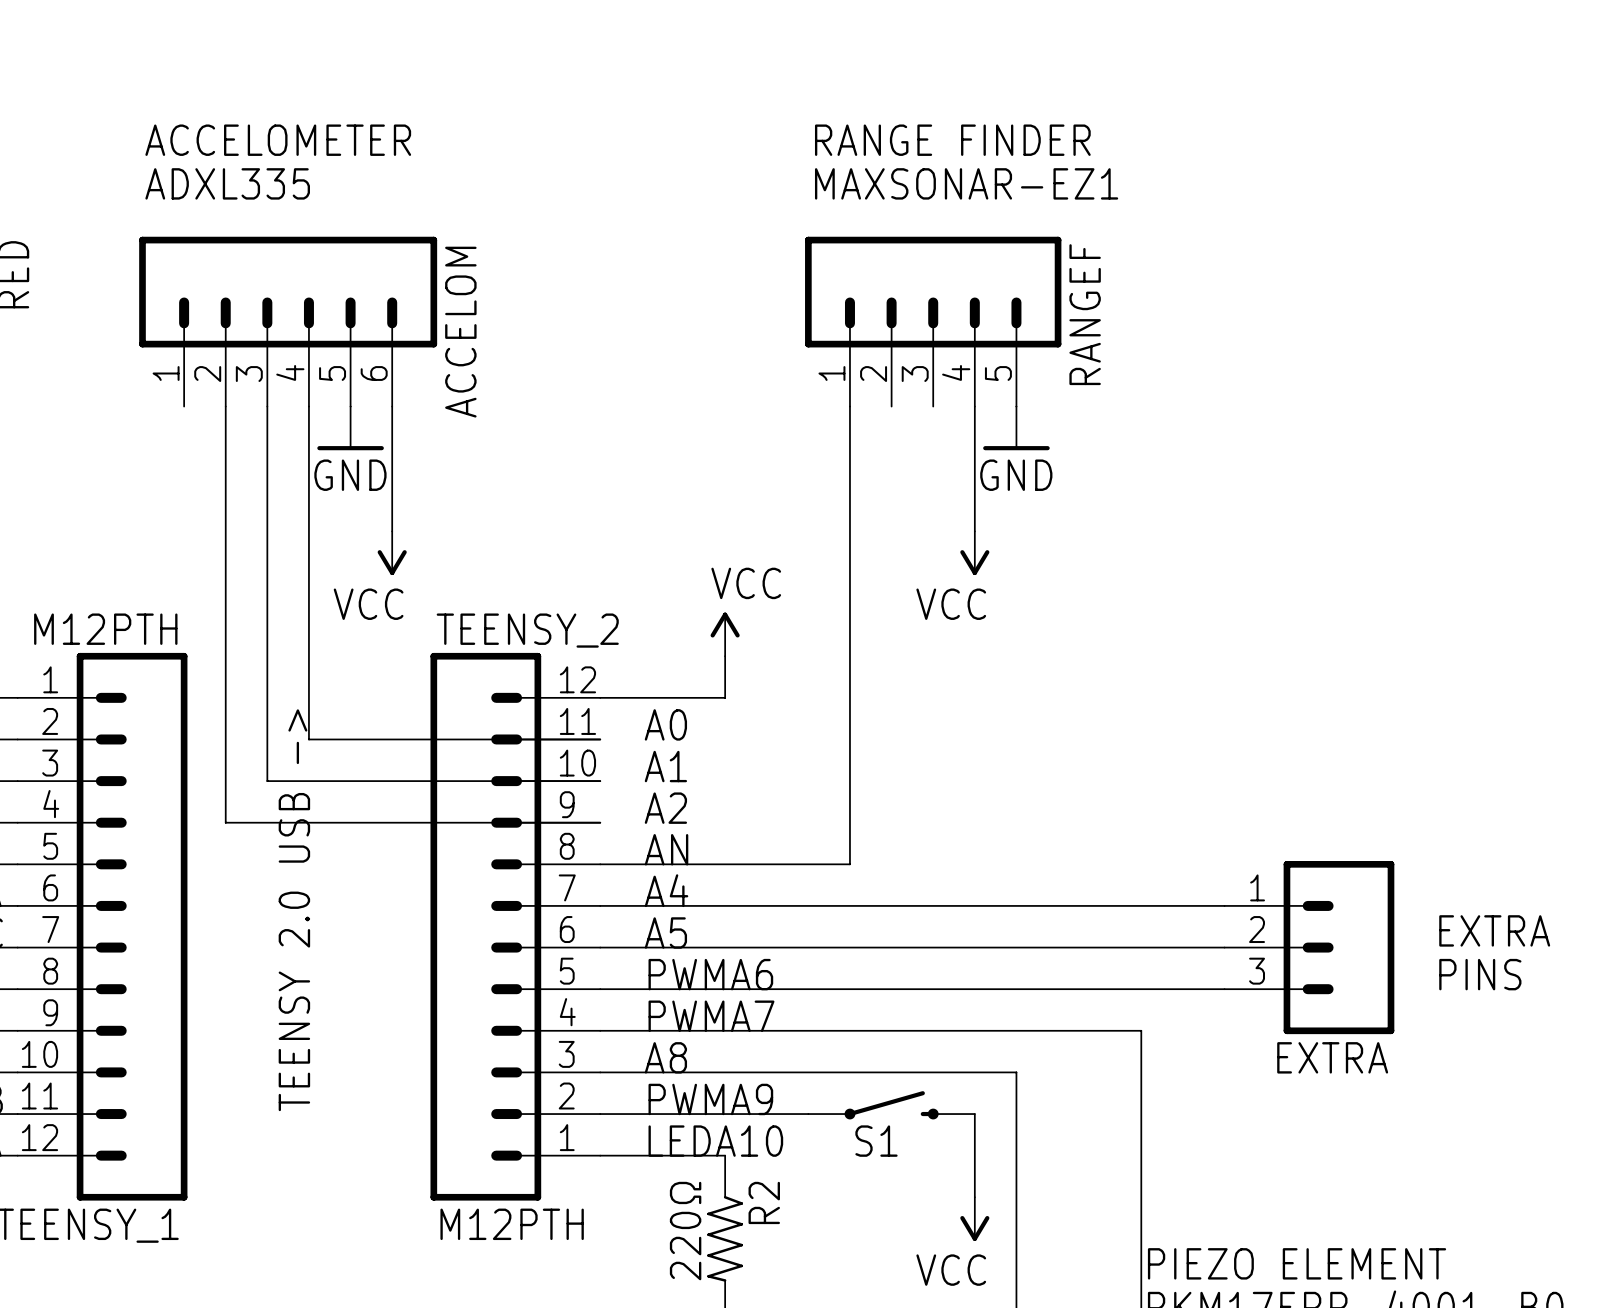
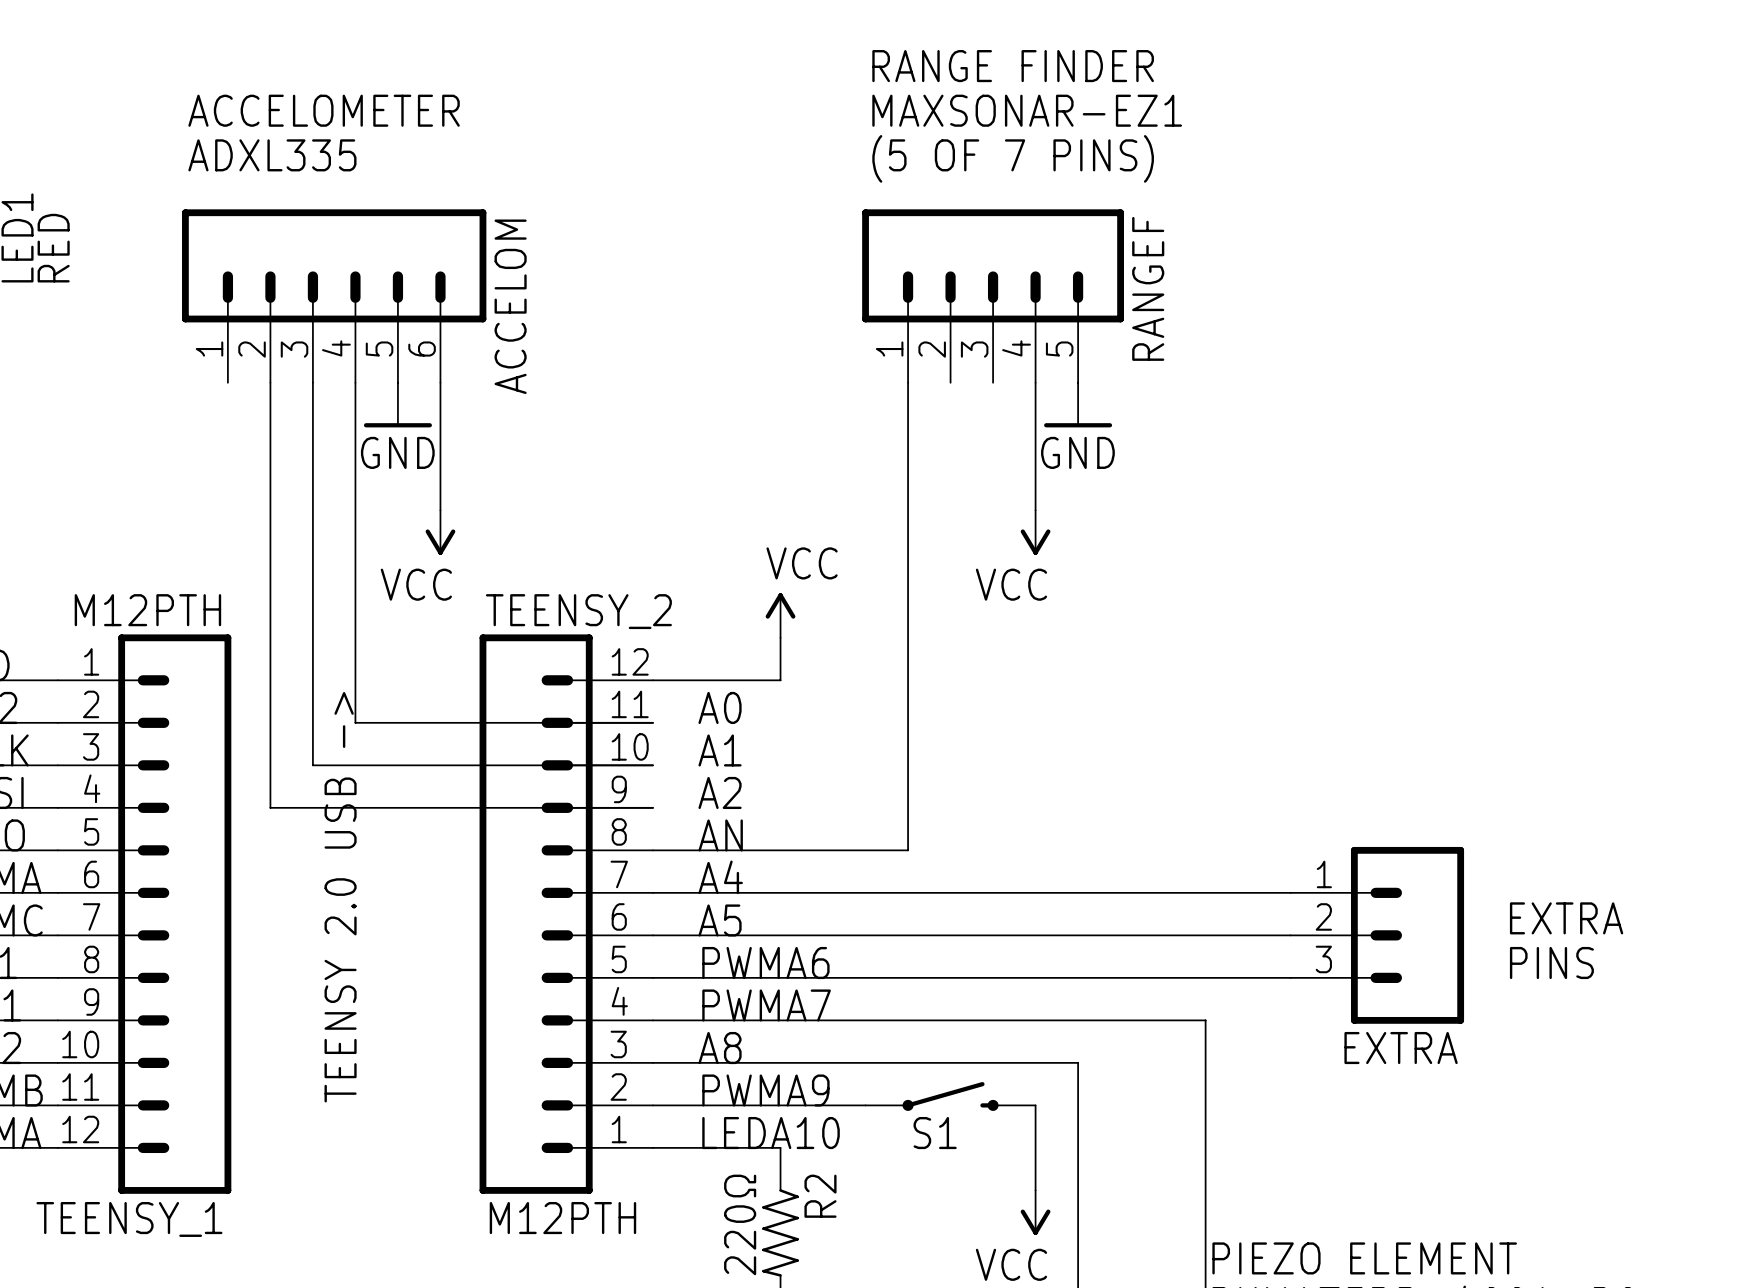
text: none -> RANGE FINDER (1013, 66)
text: RANGE FINDER (952, 140) -> MAXSONAR-EZ1 (1027, 110)
text: MAXSONAR-EZ1 (966, 183) -> (5 OF 7 PINS) (1013, 158)

